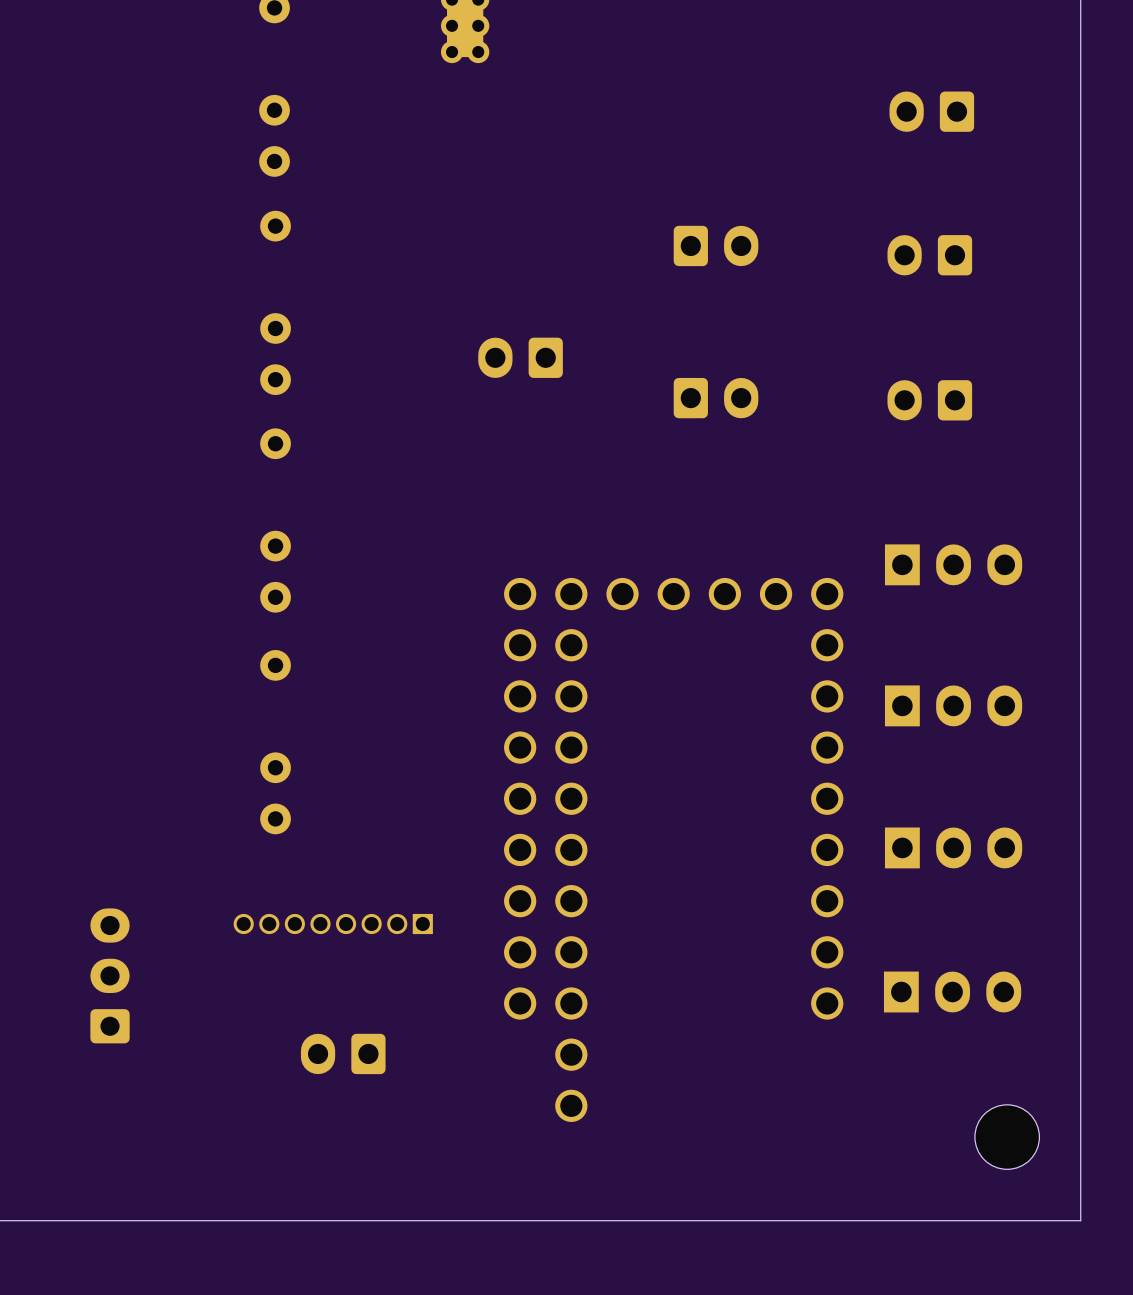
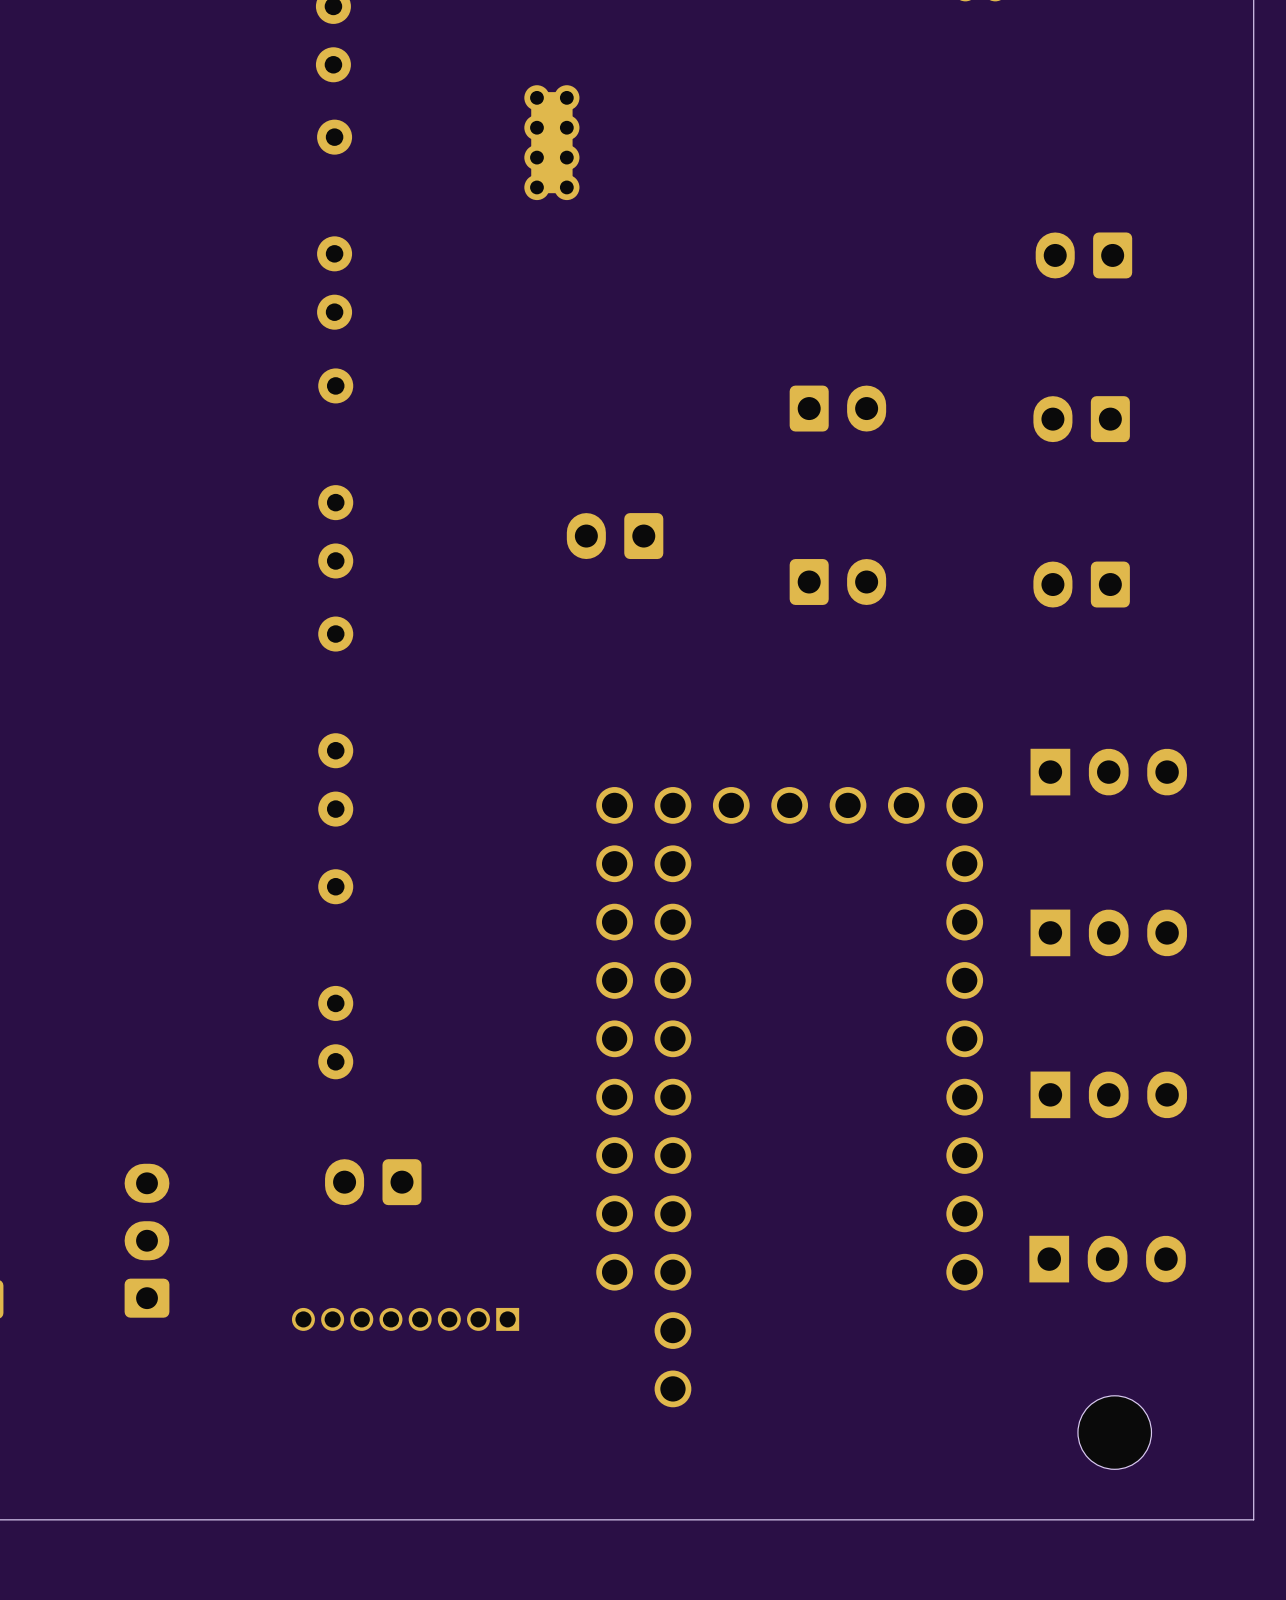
part: none -> (373, 1182)
part: (333, 924) -> none
part footprint: [300, 1033, 386, 1075] -> [291, 1307, 520, 1331]
part position: (1007, 1137) -> (1114, 1432)

